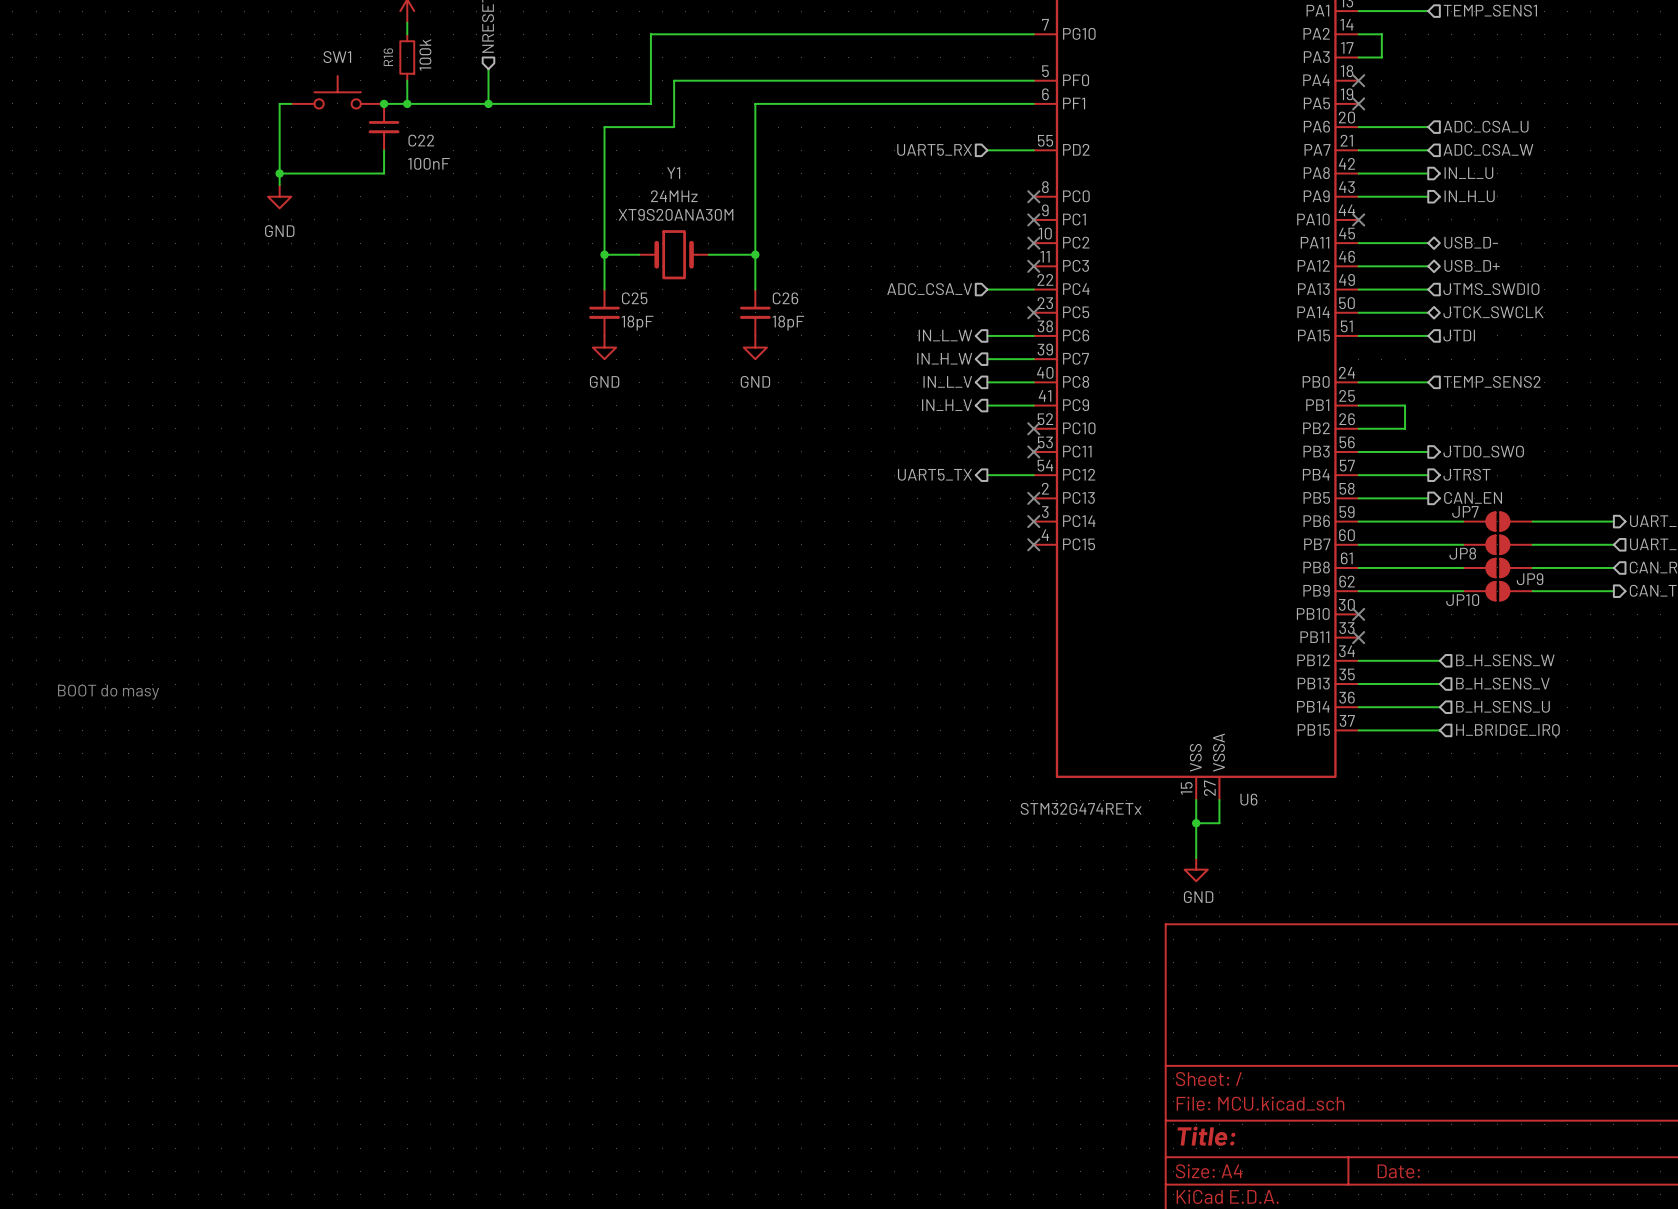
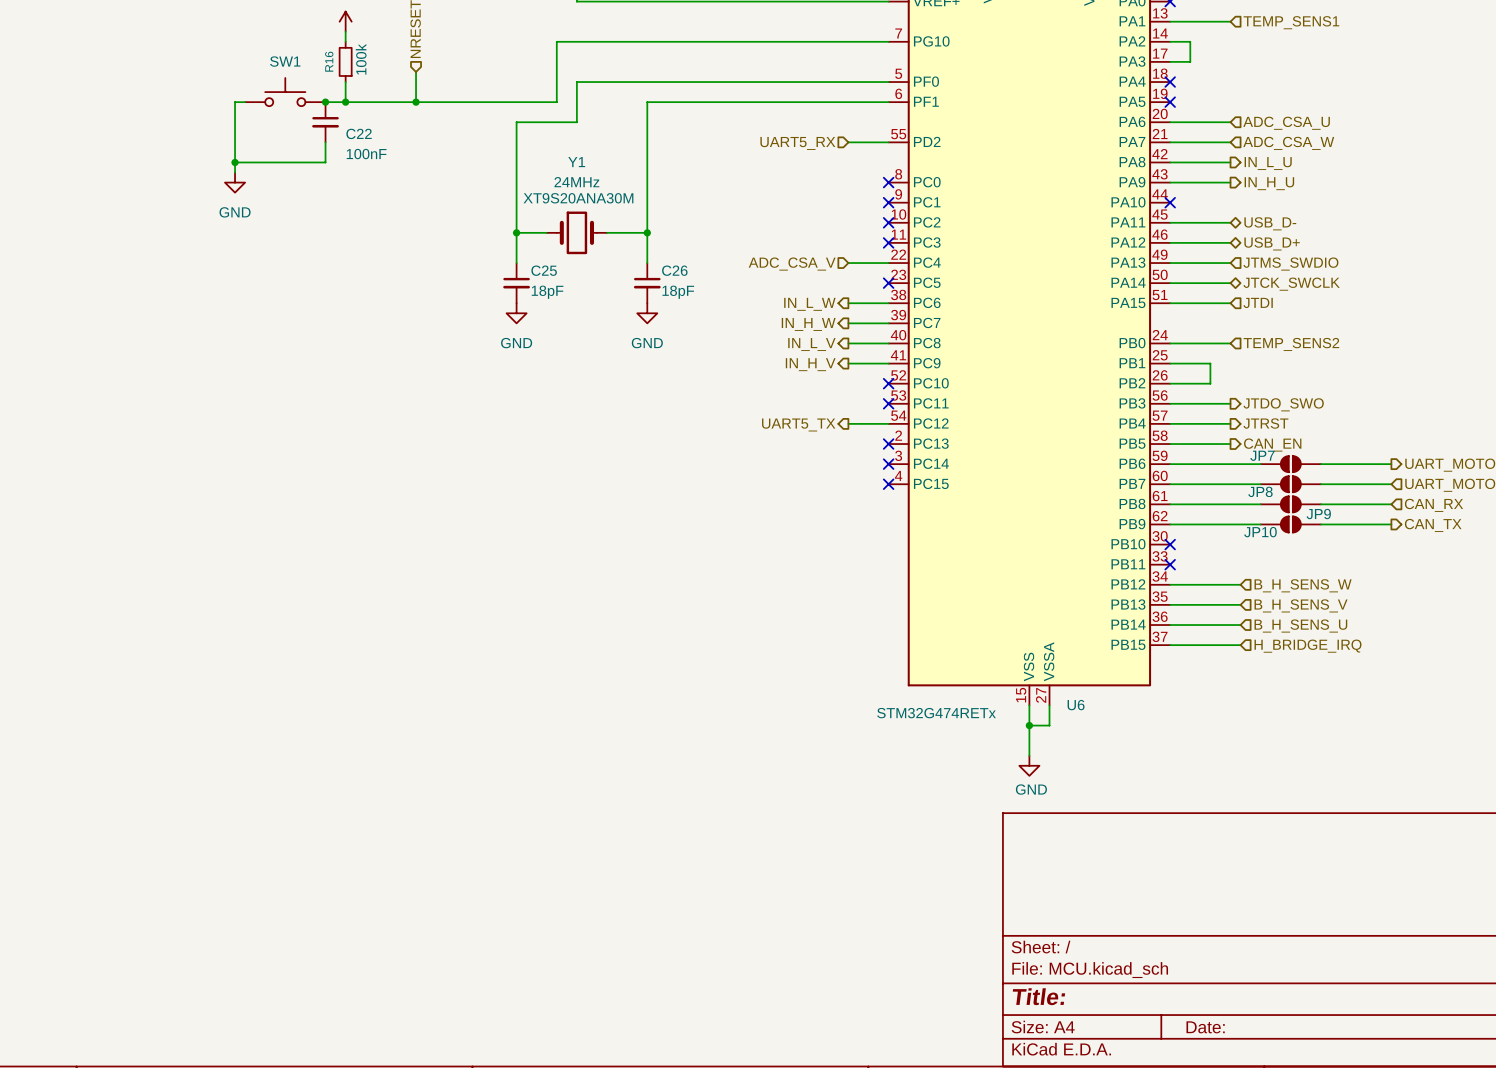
text: BOOT do masy (108, 692) -> none

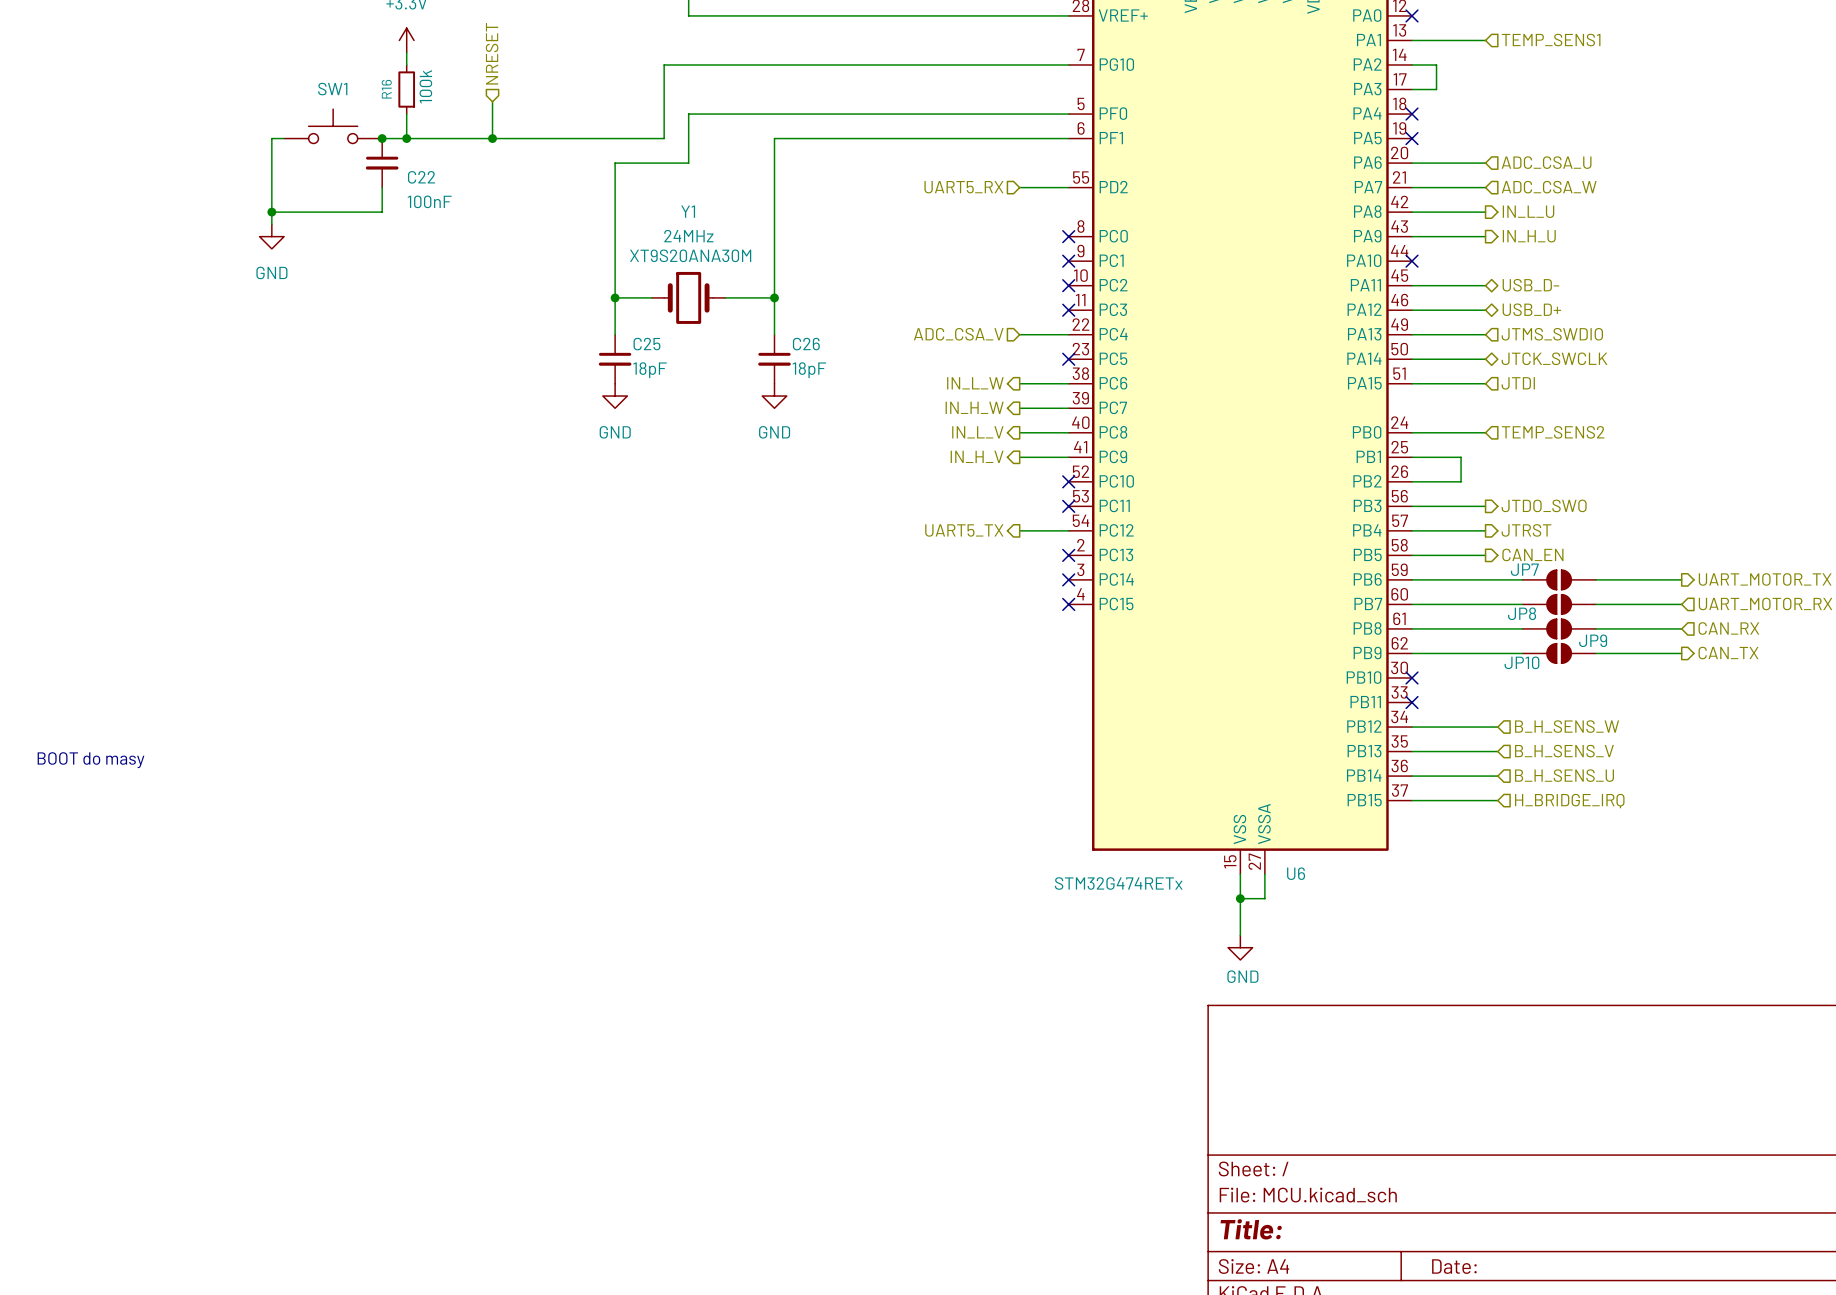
text: none -> BOOT do masy (91, 760)

